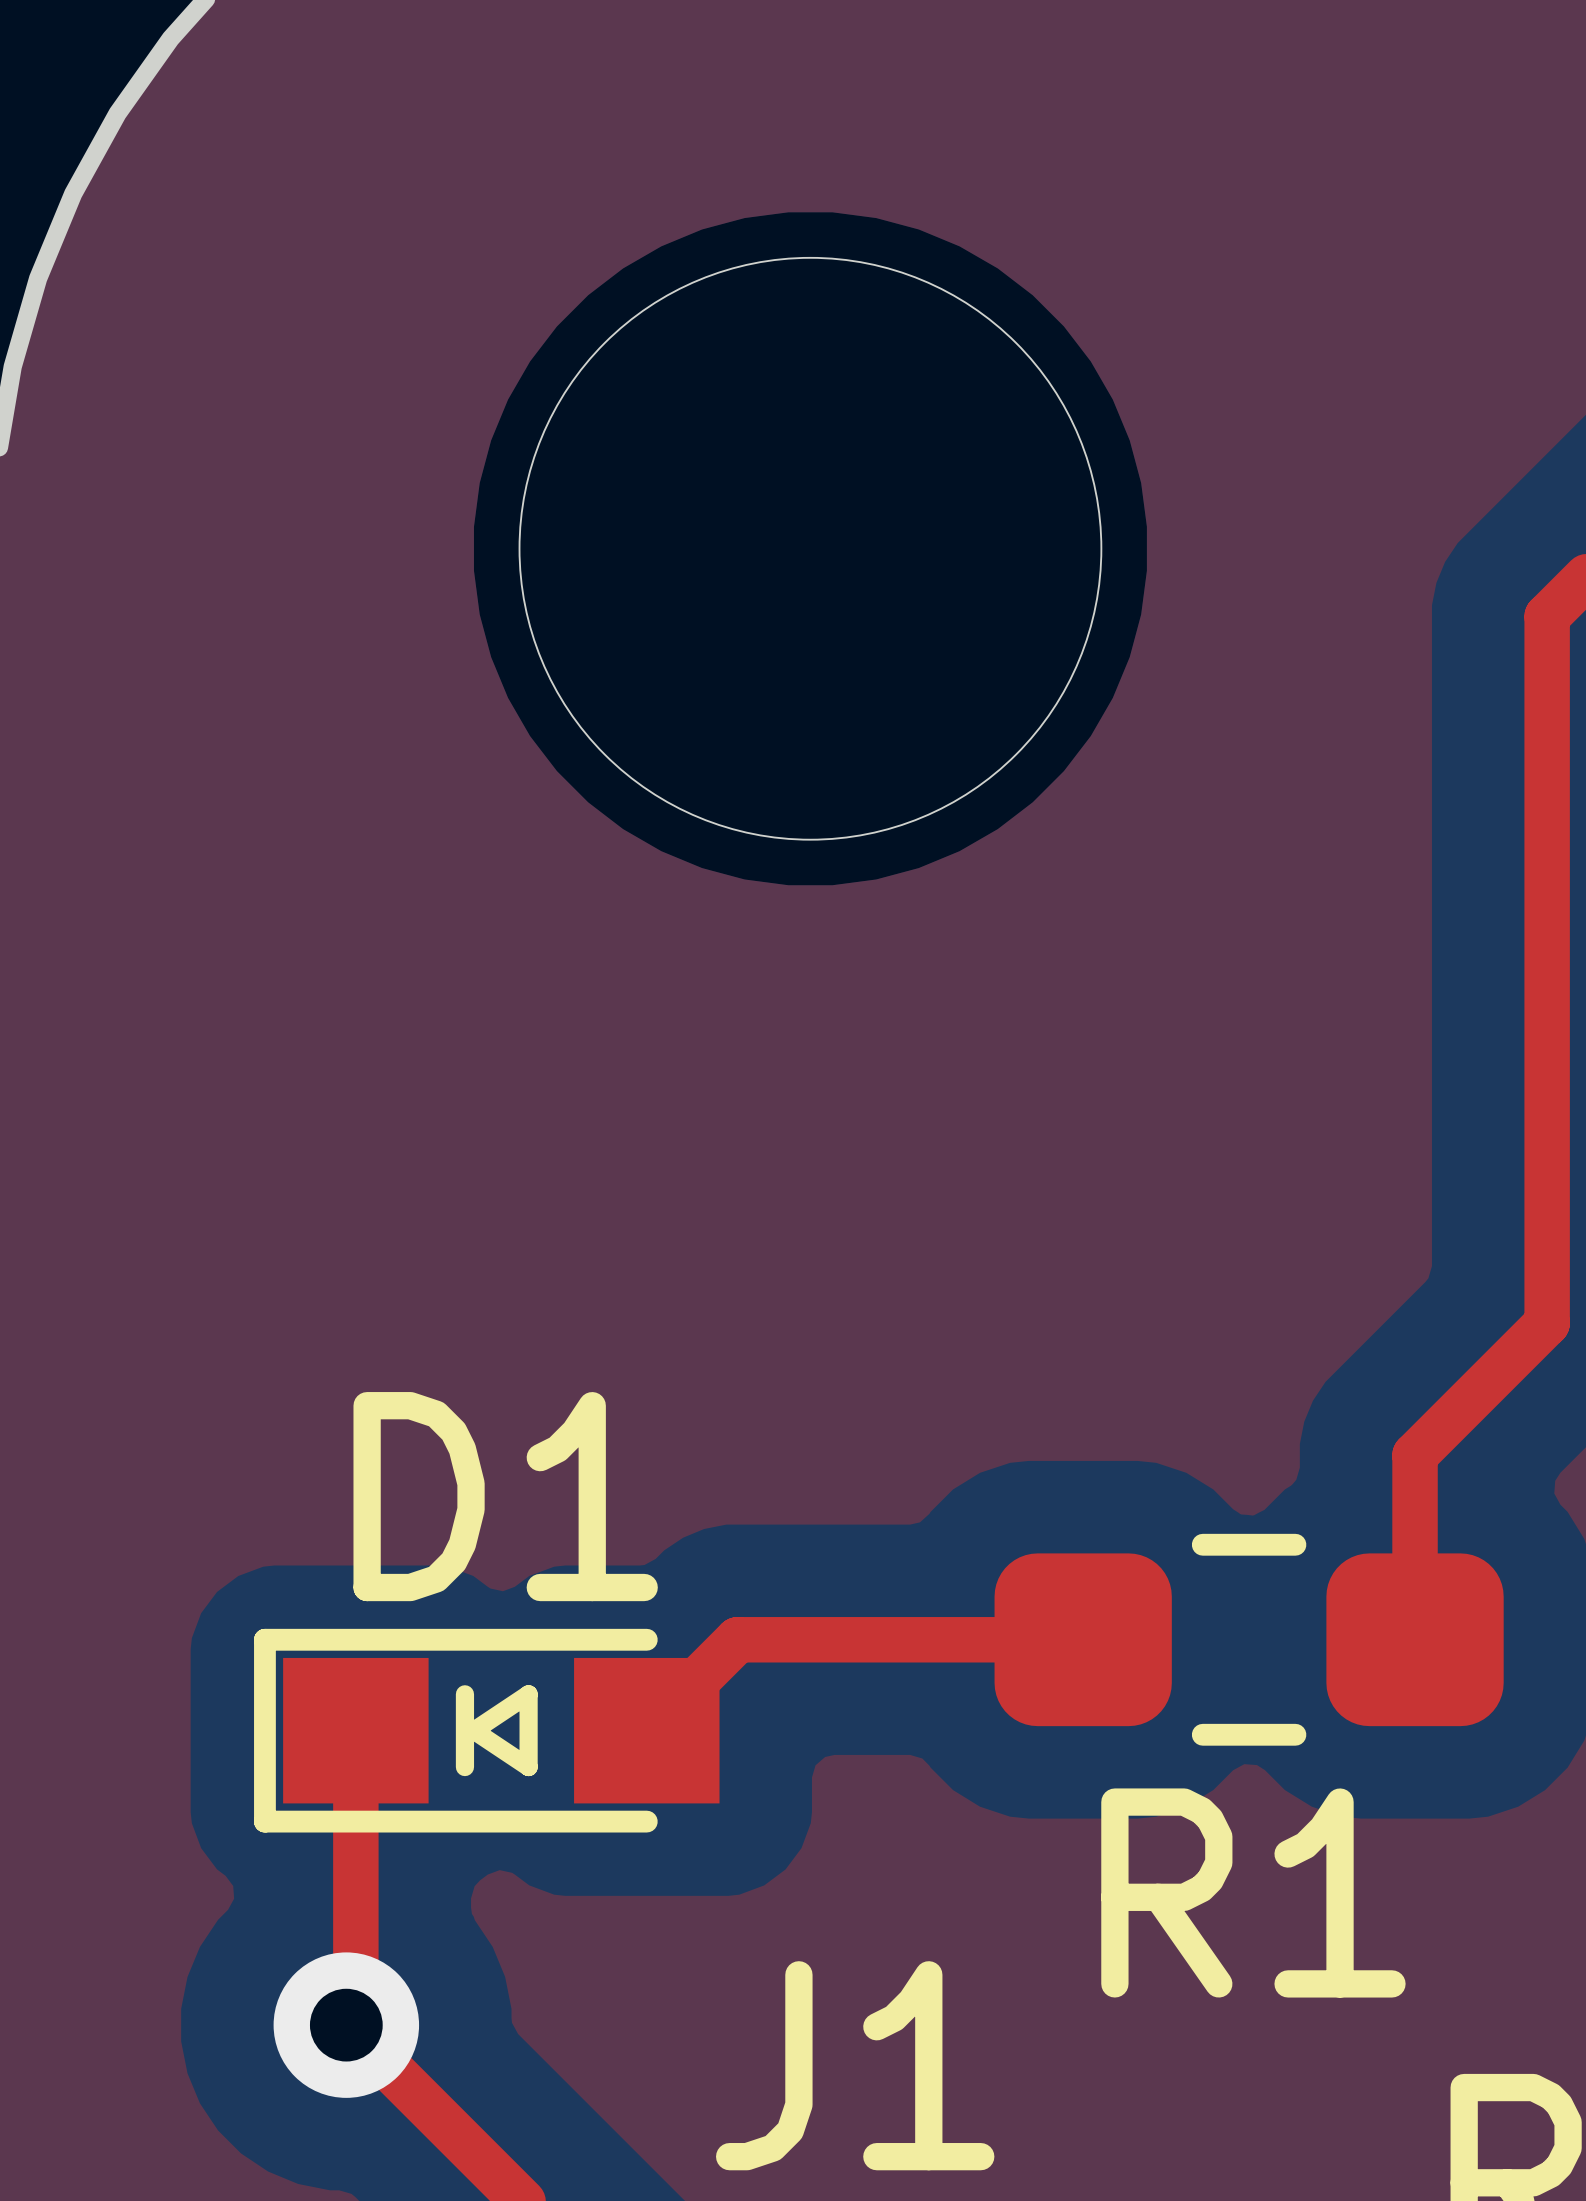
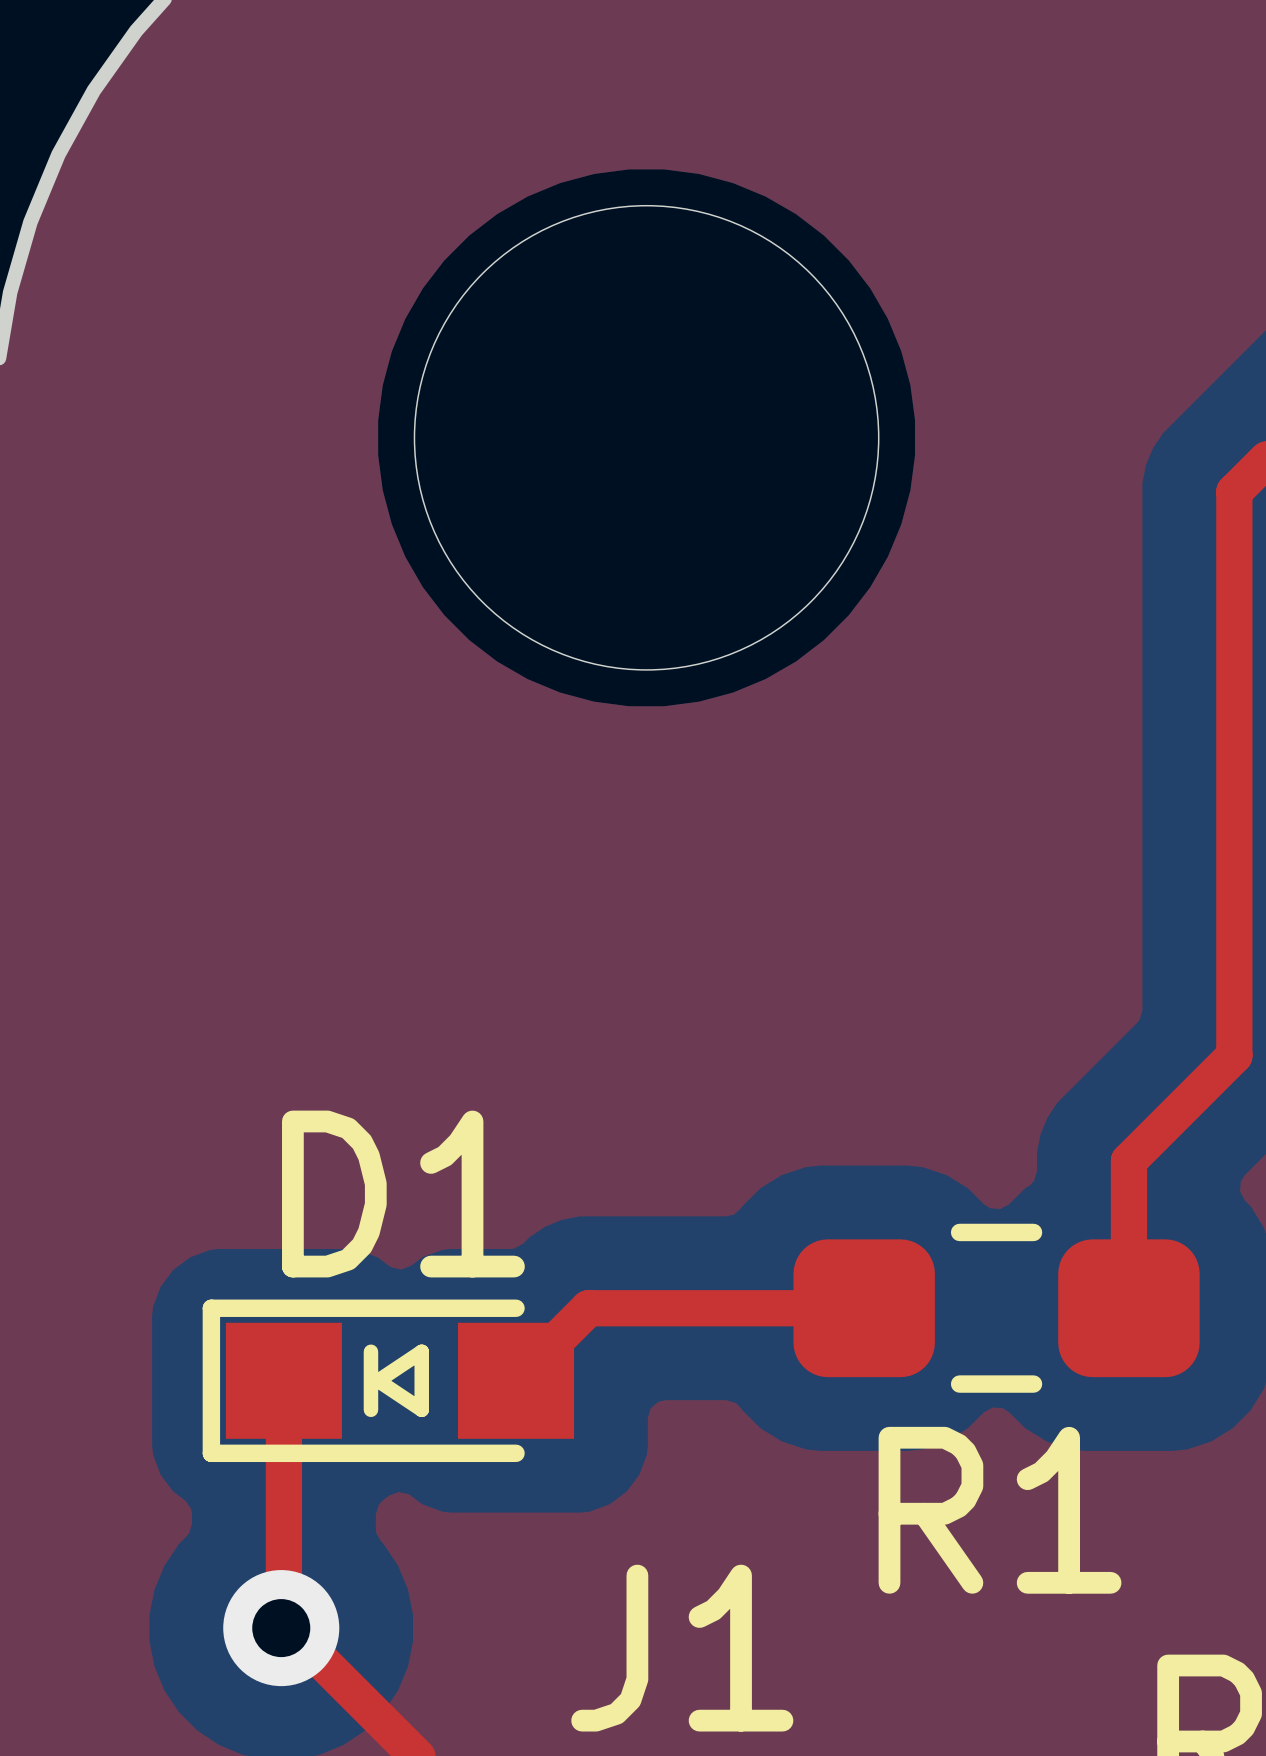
via position: (346, 2025) -> (281, 1628)

